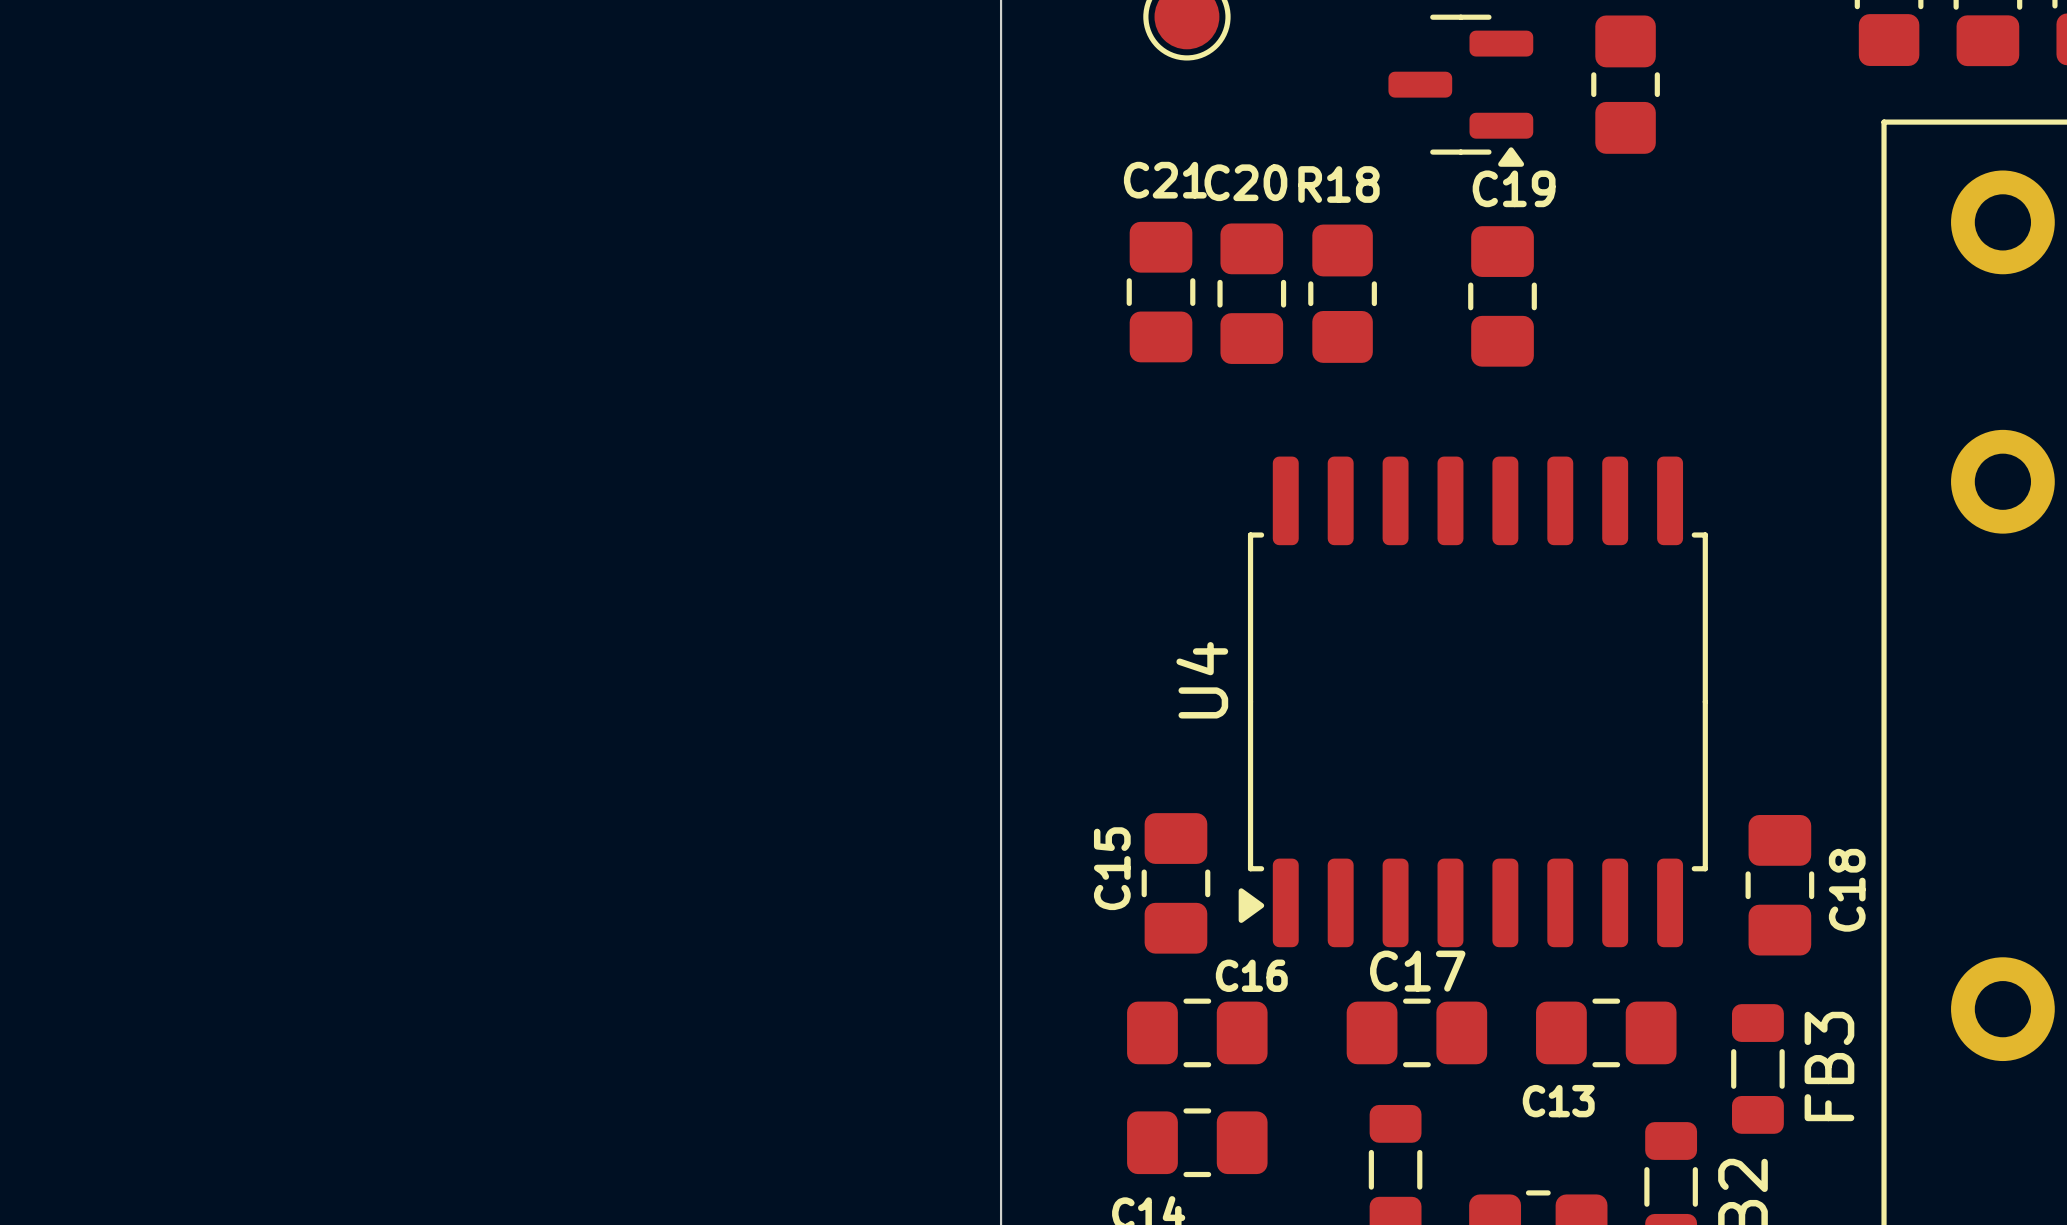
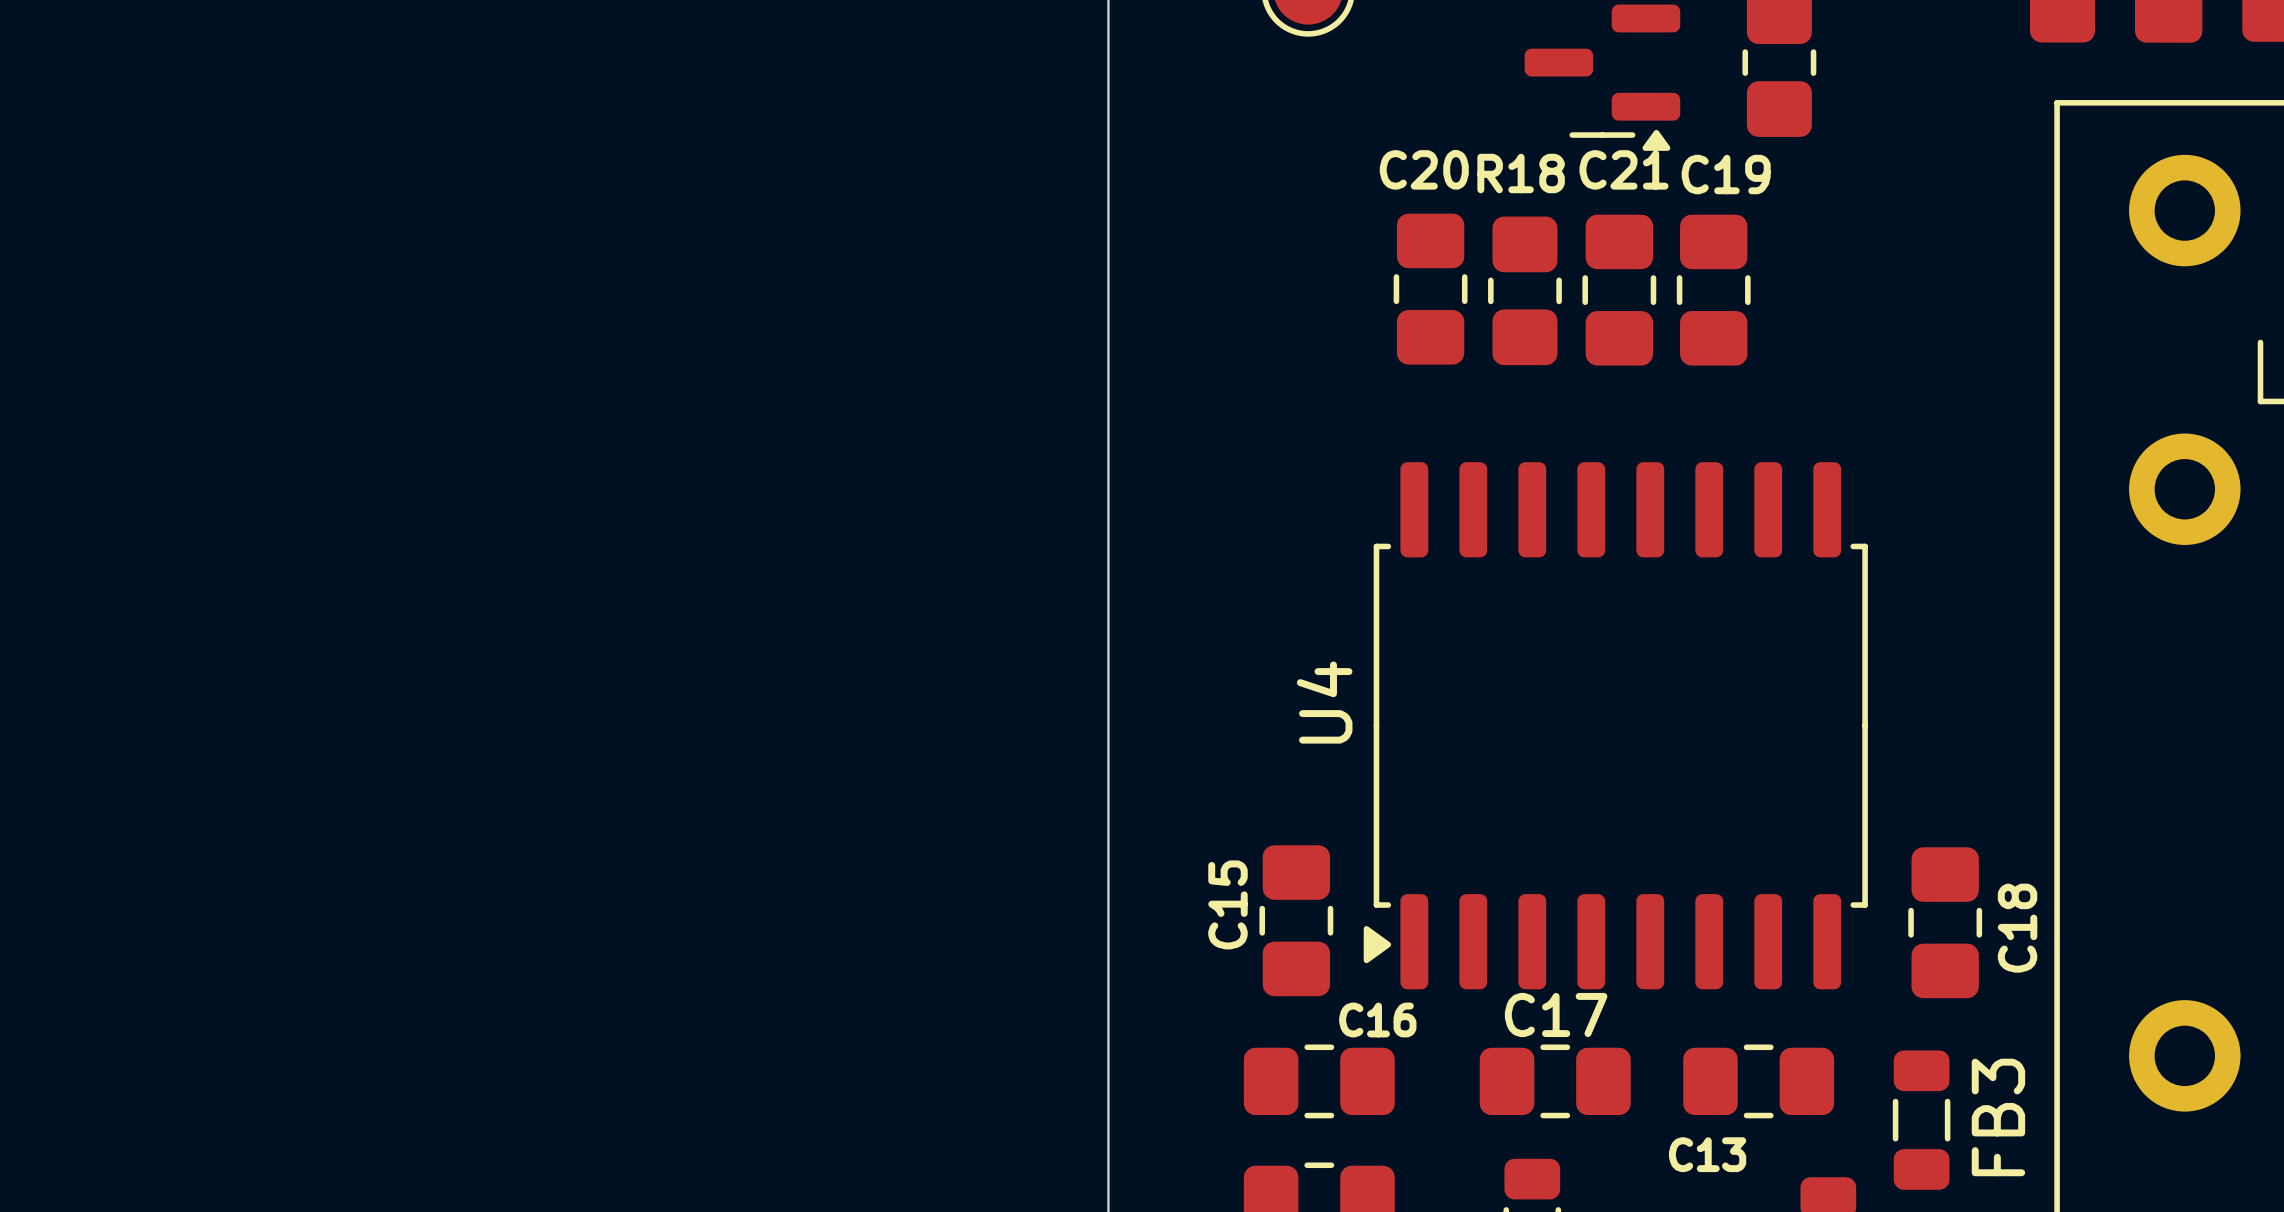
C21 position: (1161, 292) -> (1619, 290)
C20 position: (1251, 293) -> (1430, 289)
R18 position: (1342, 293) -> (1524, 290)
C19 position: (1502, 296) -> (1713, 290)

